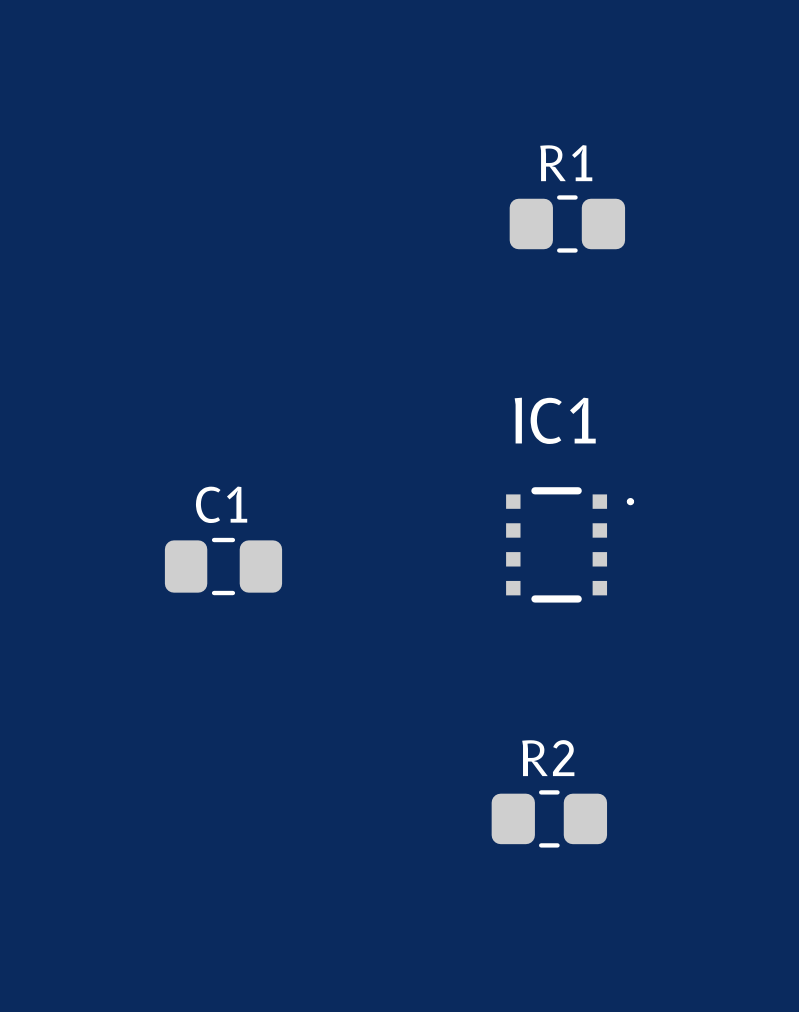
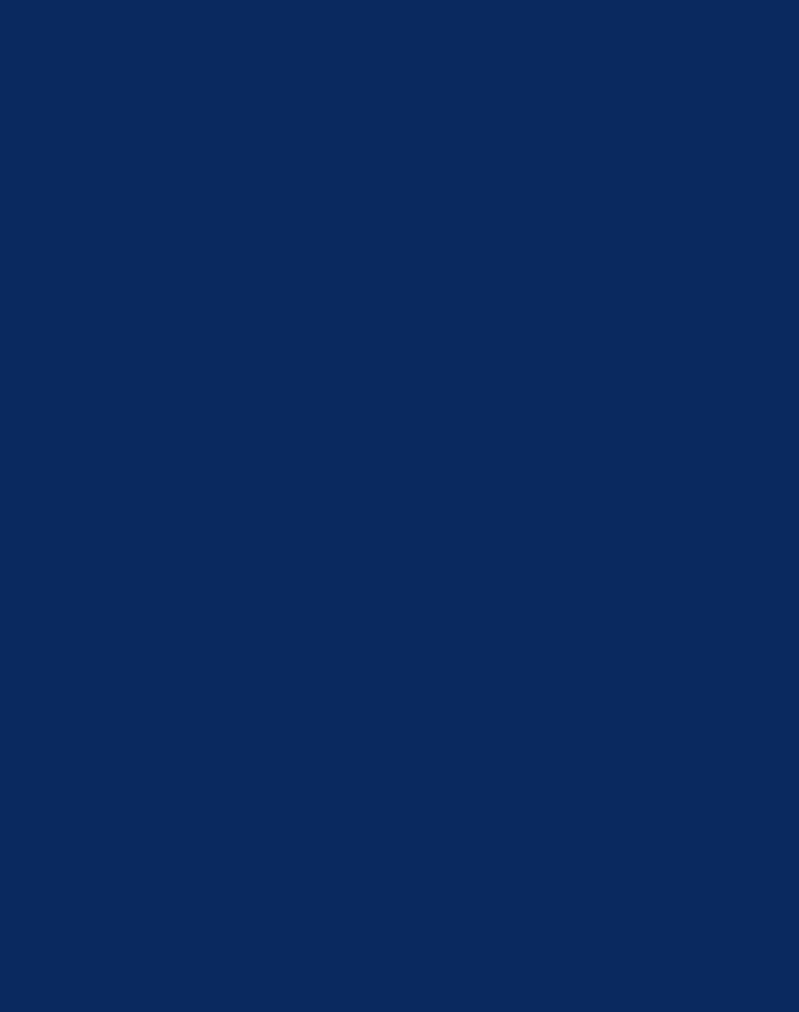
R1: (567, 223) -> none
IC1: (570, 544) -> none
C1: (223, 566) -> none
R2: (549, 818) -> none

